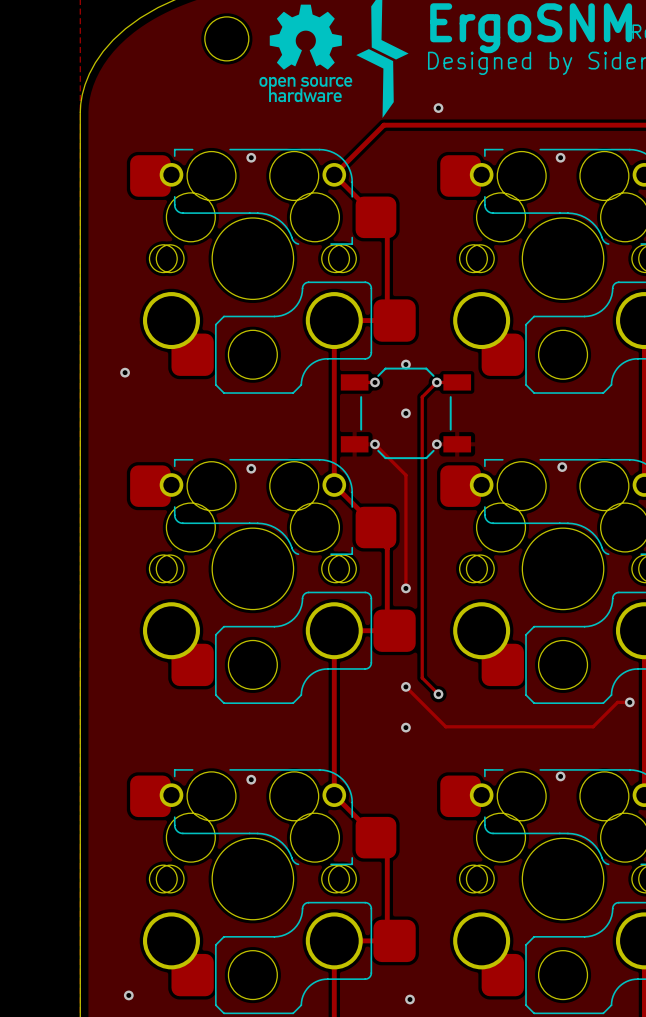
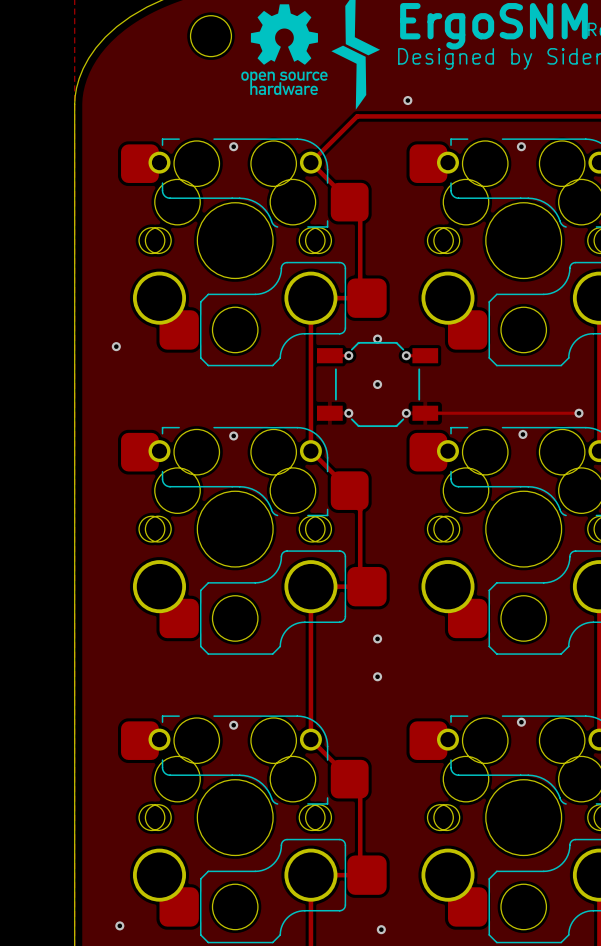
track: (436, 382) (422, 397) (422, 677) (438, 694) -> none
track: (375, 444) (405, 475) (405, 588) -> none
track: none -> (425, 413) (578, 413)
via: none -> (578, 413)
via: (405, 588) -> none
track: (405, 686) (445, 726) (593, 726) (617, 702) (629, 702) -> none
via: (438, 694) -> none
via: (629, 702) -> none

